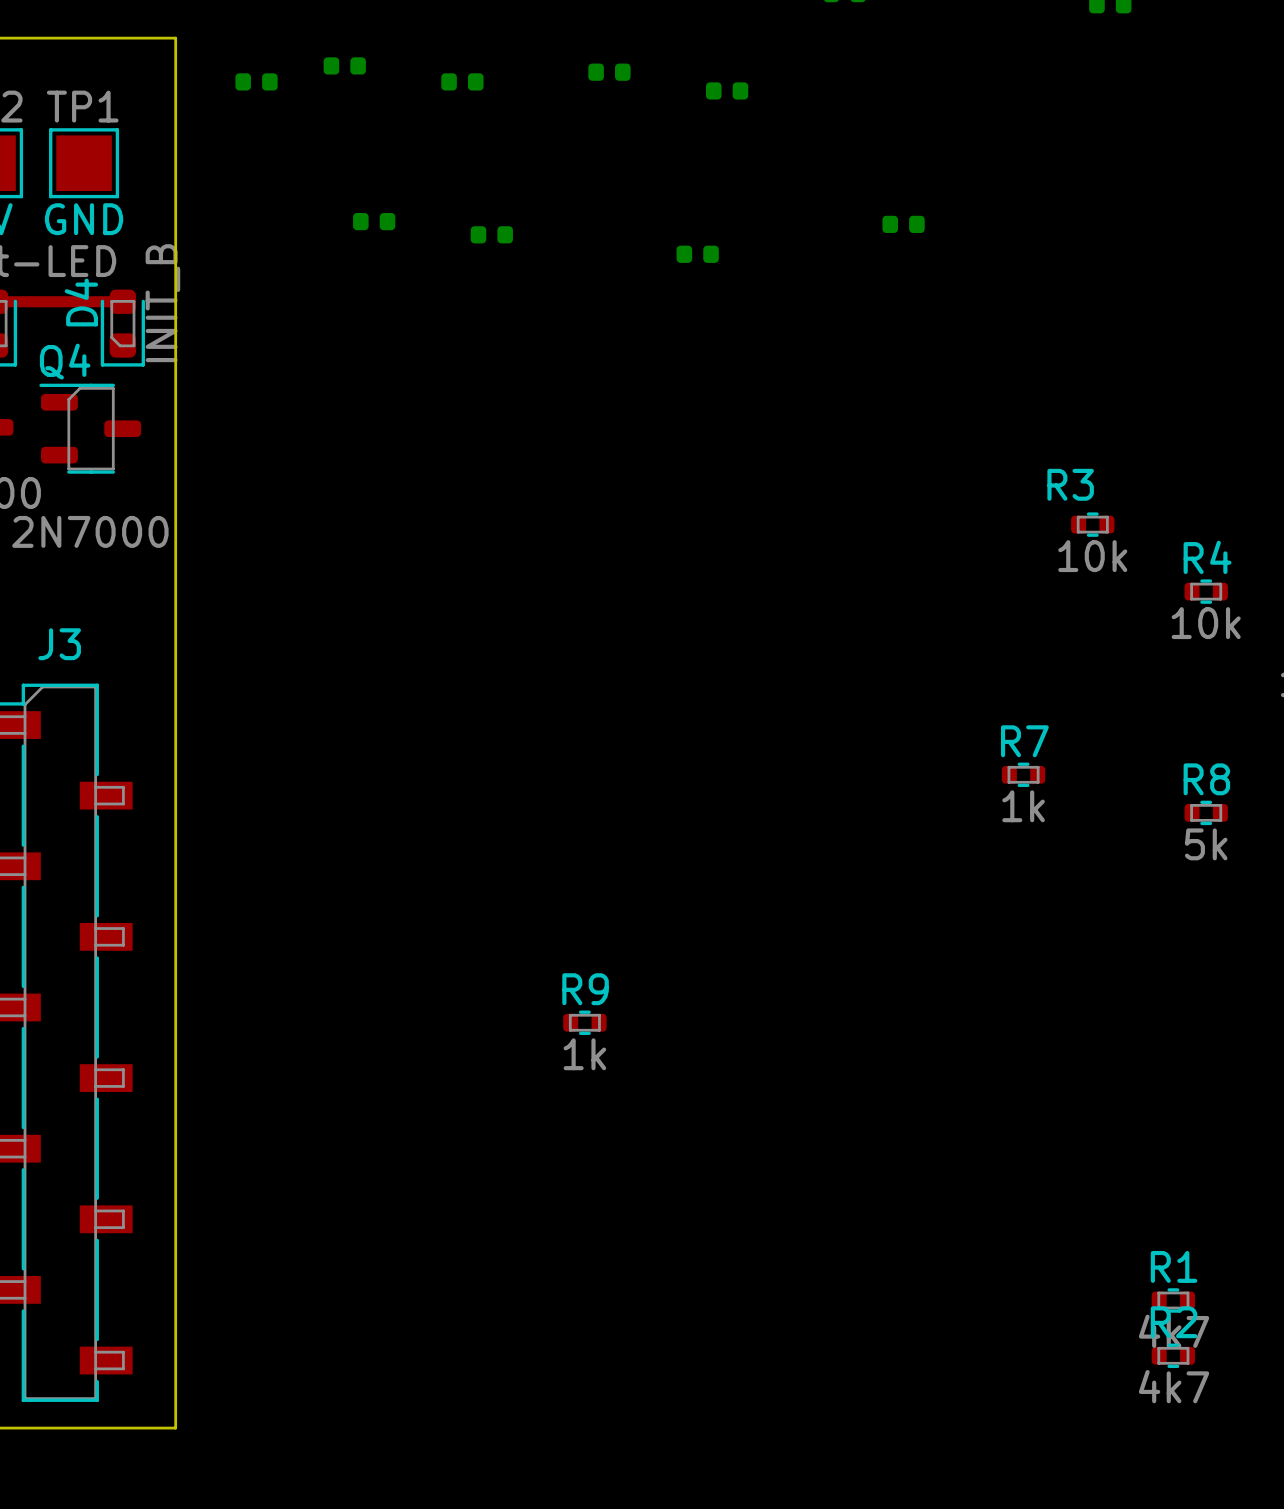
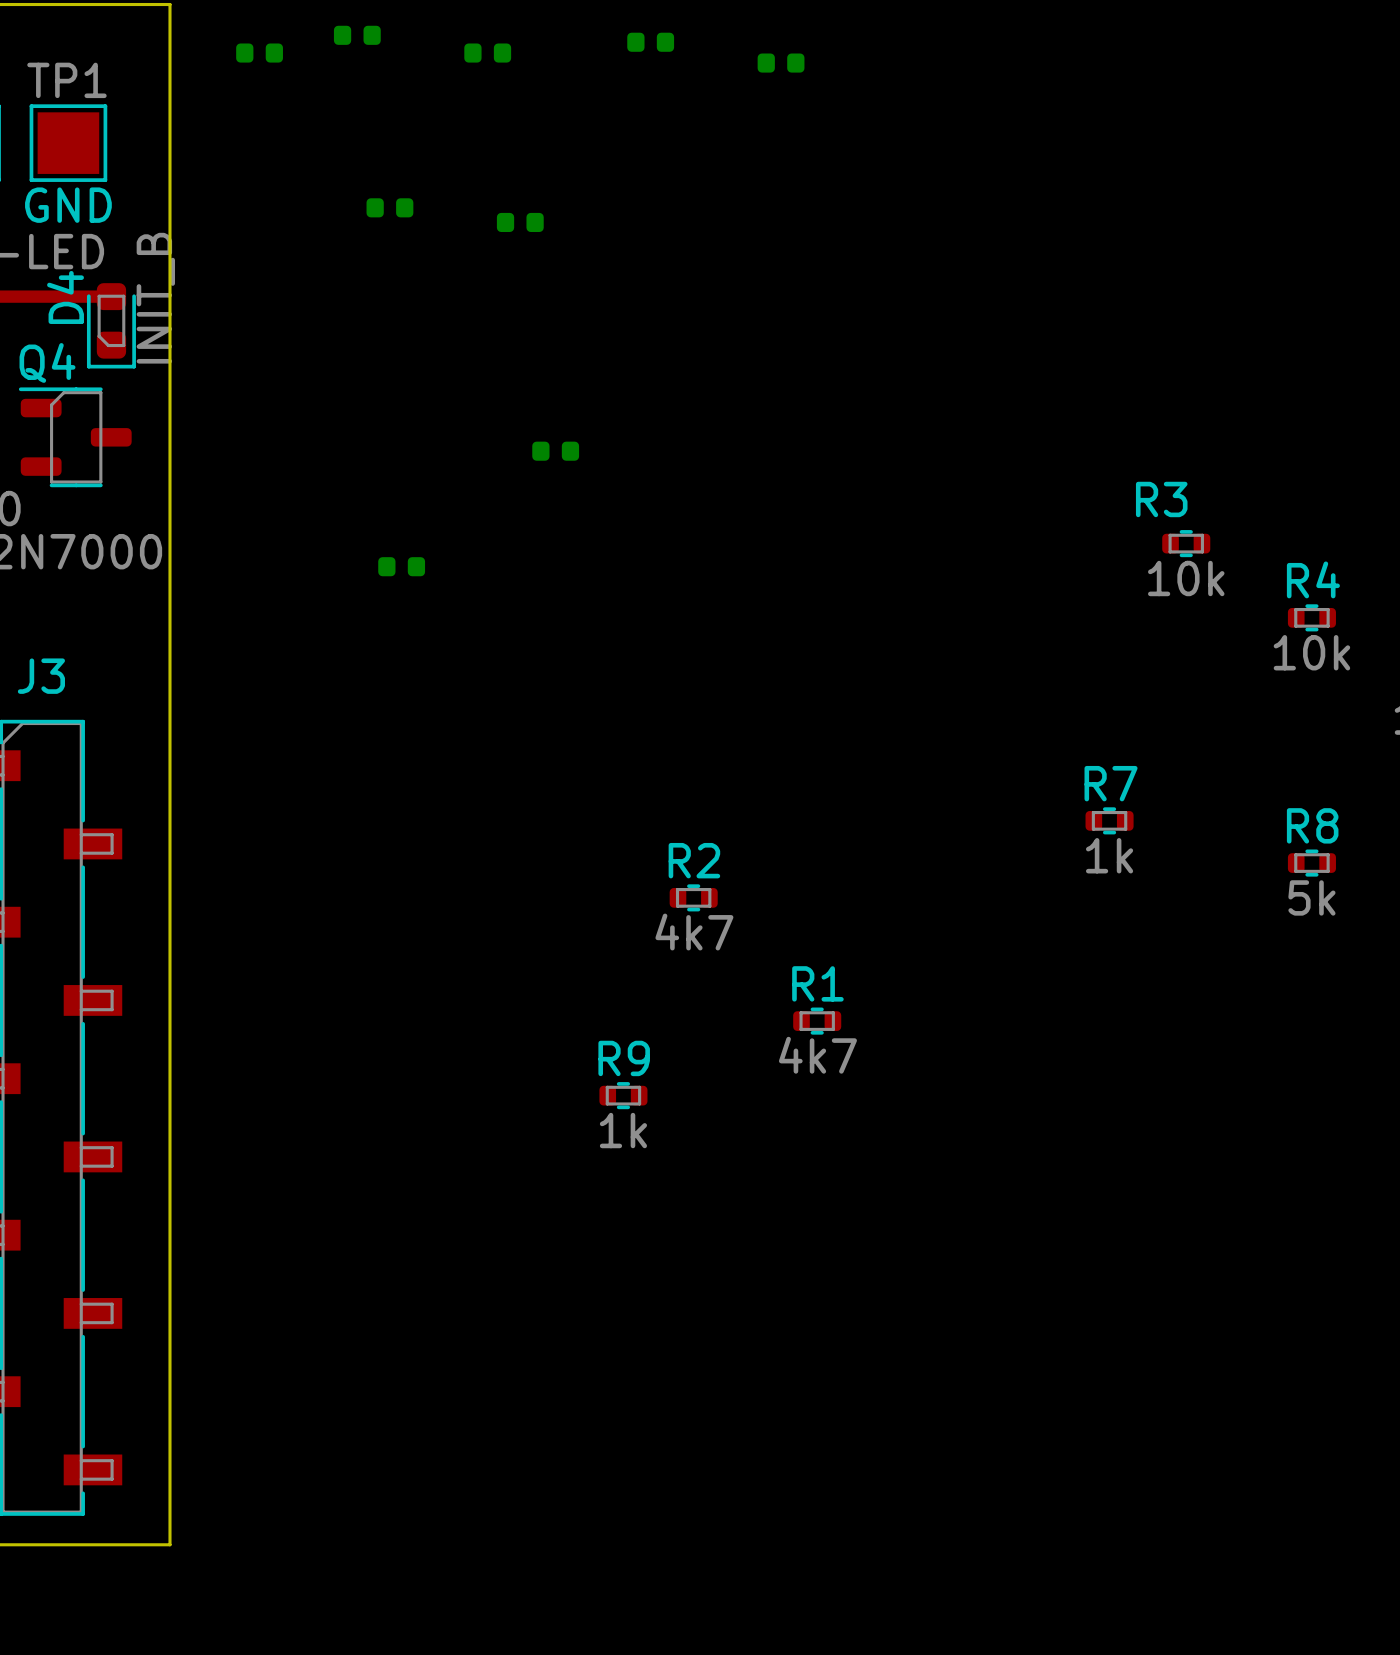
part: (903, 224) -> none
part: (697, 254) -> none
part: none -> (555, 451)
part: none -> (401, 566)
R1 position: (1173, 1300) -> (817, 1021)
R2 position: (1173, 1355) -> (693, 897)

